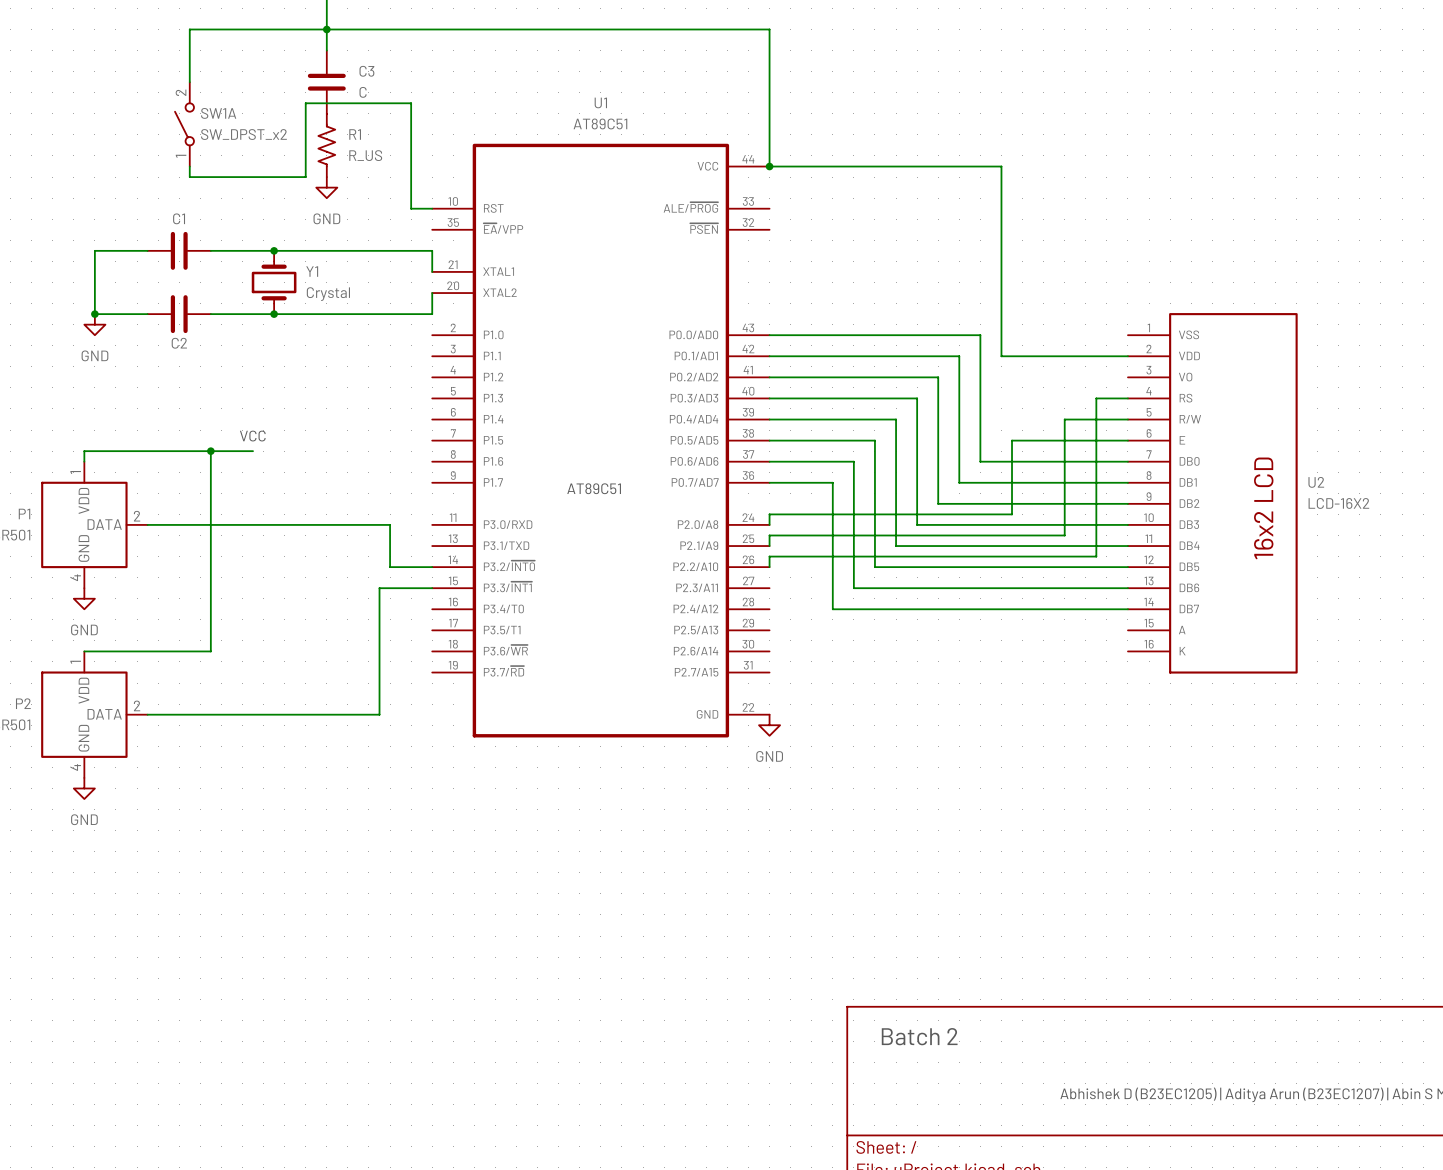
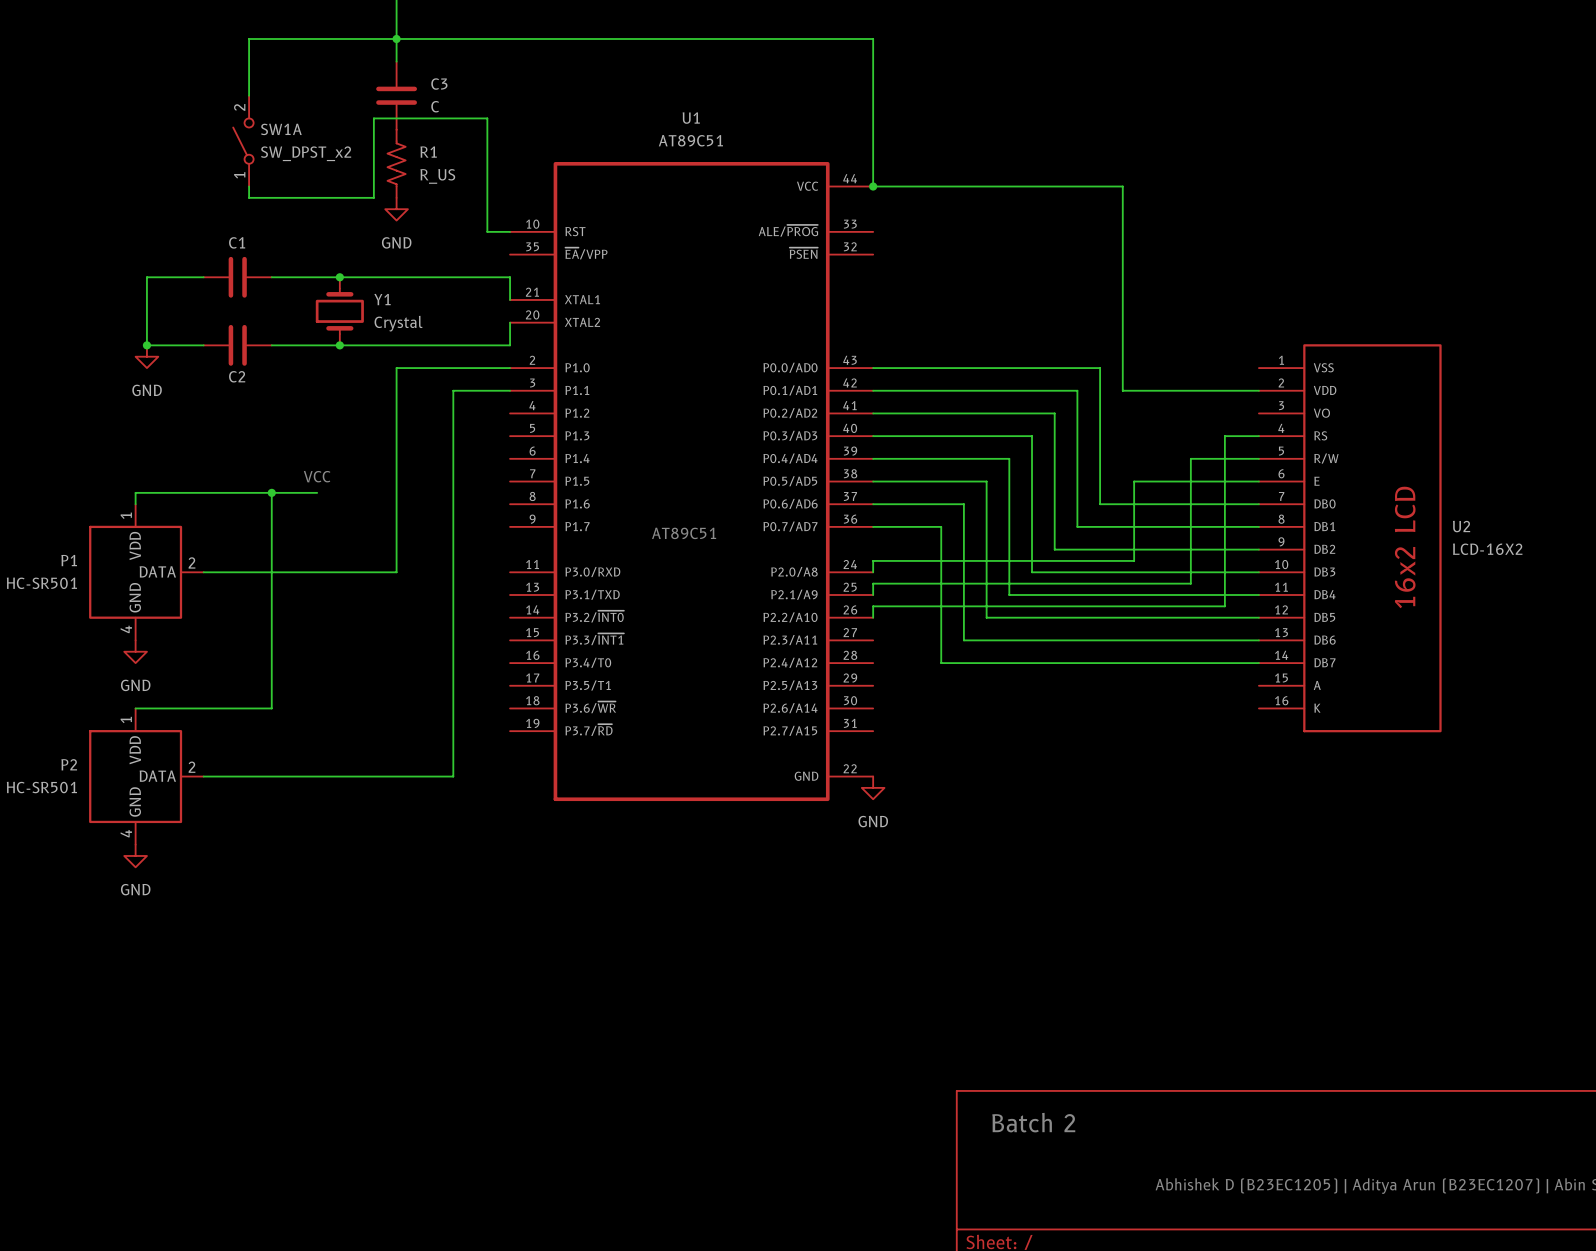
wire: (326, 524) (390, 524) (390, 567) (432, 567) -> (396, 572) (396, 368) (510, 368)
wire: (379, 588) (432, 588) -> (453, 640) (453, 390) (510, 390)

